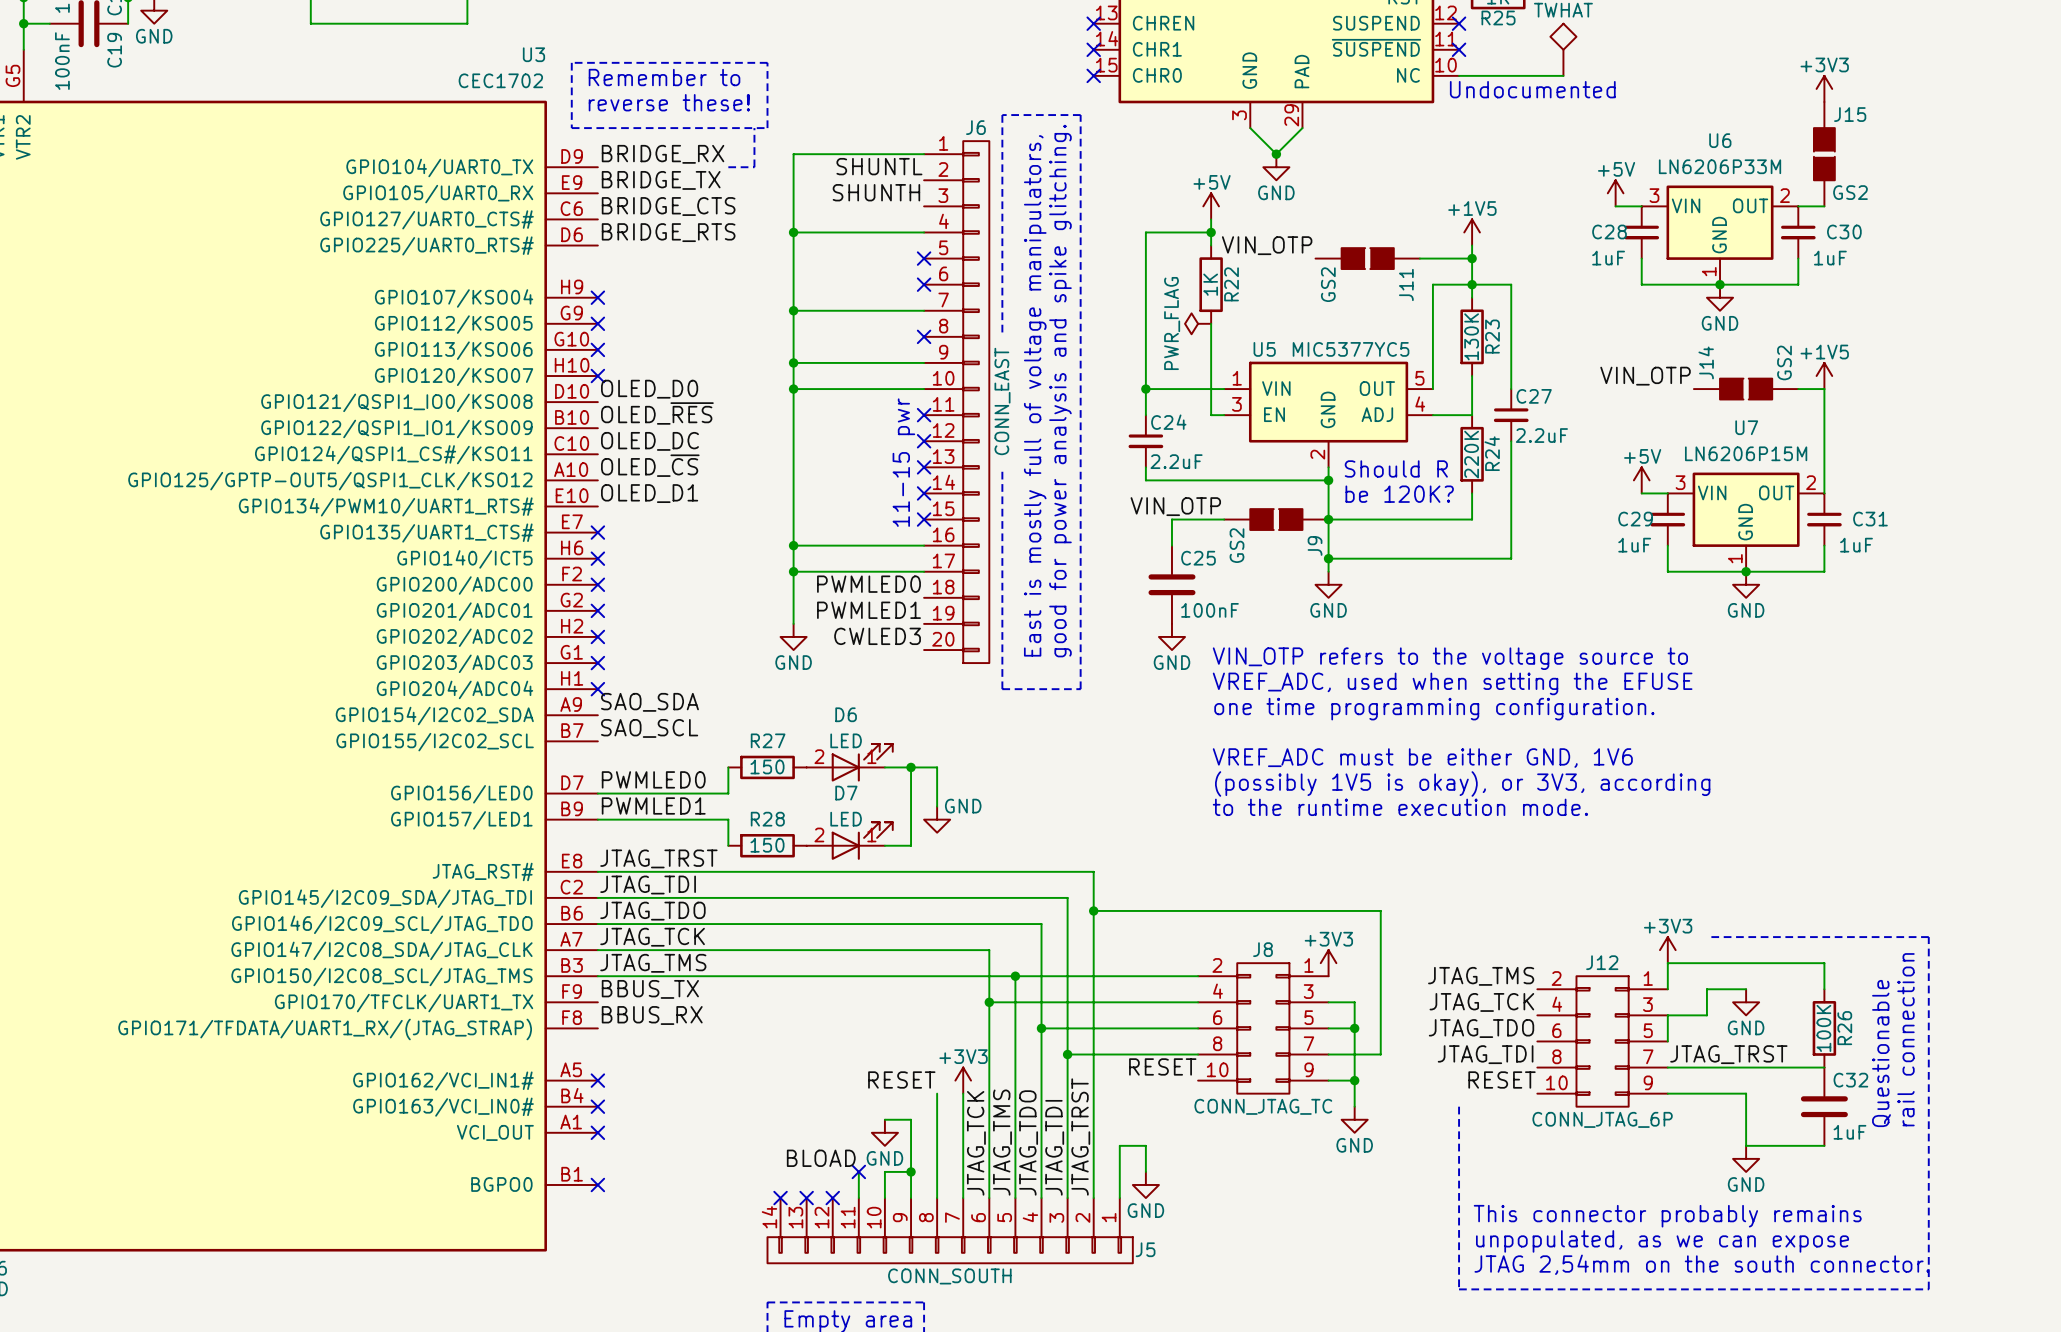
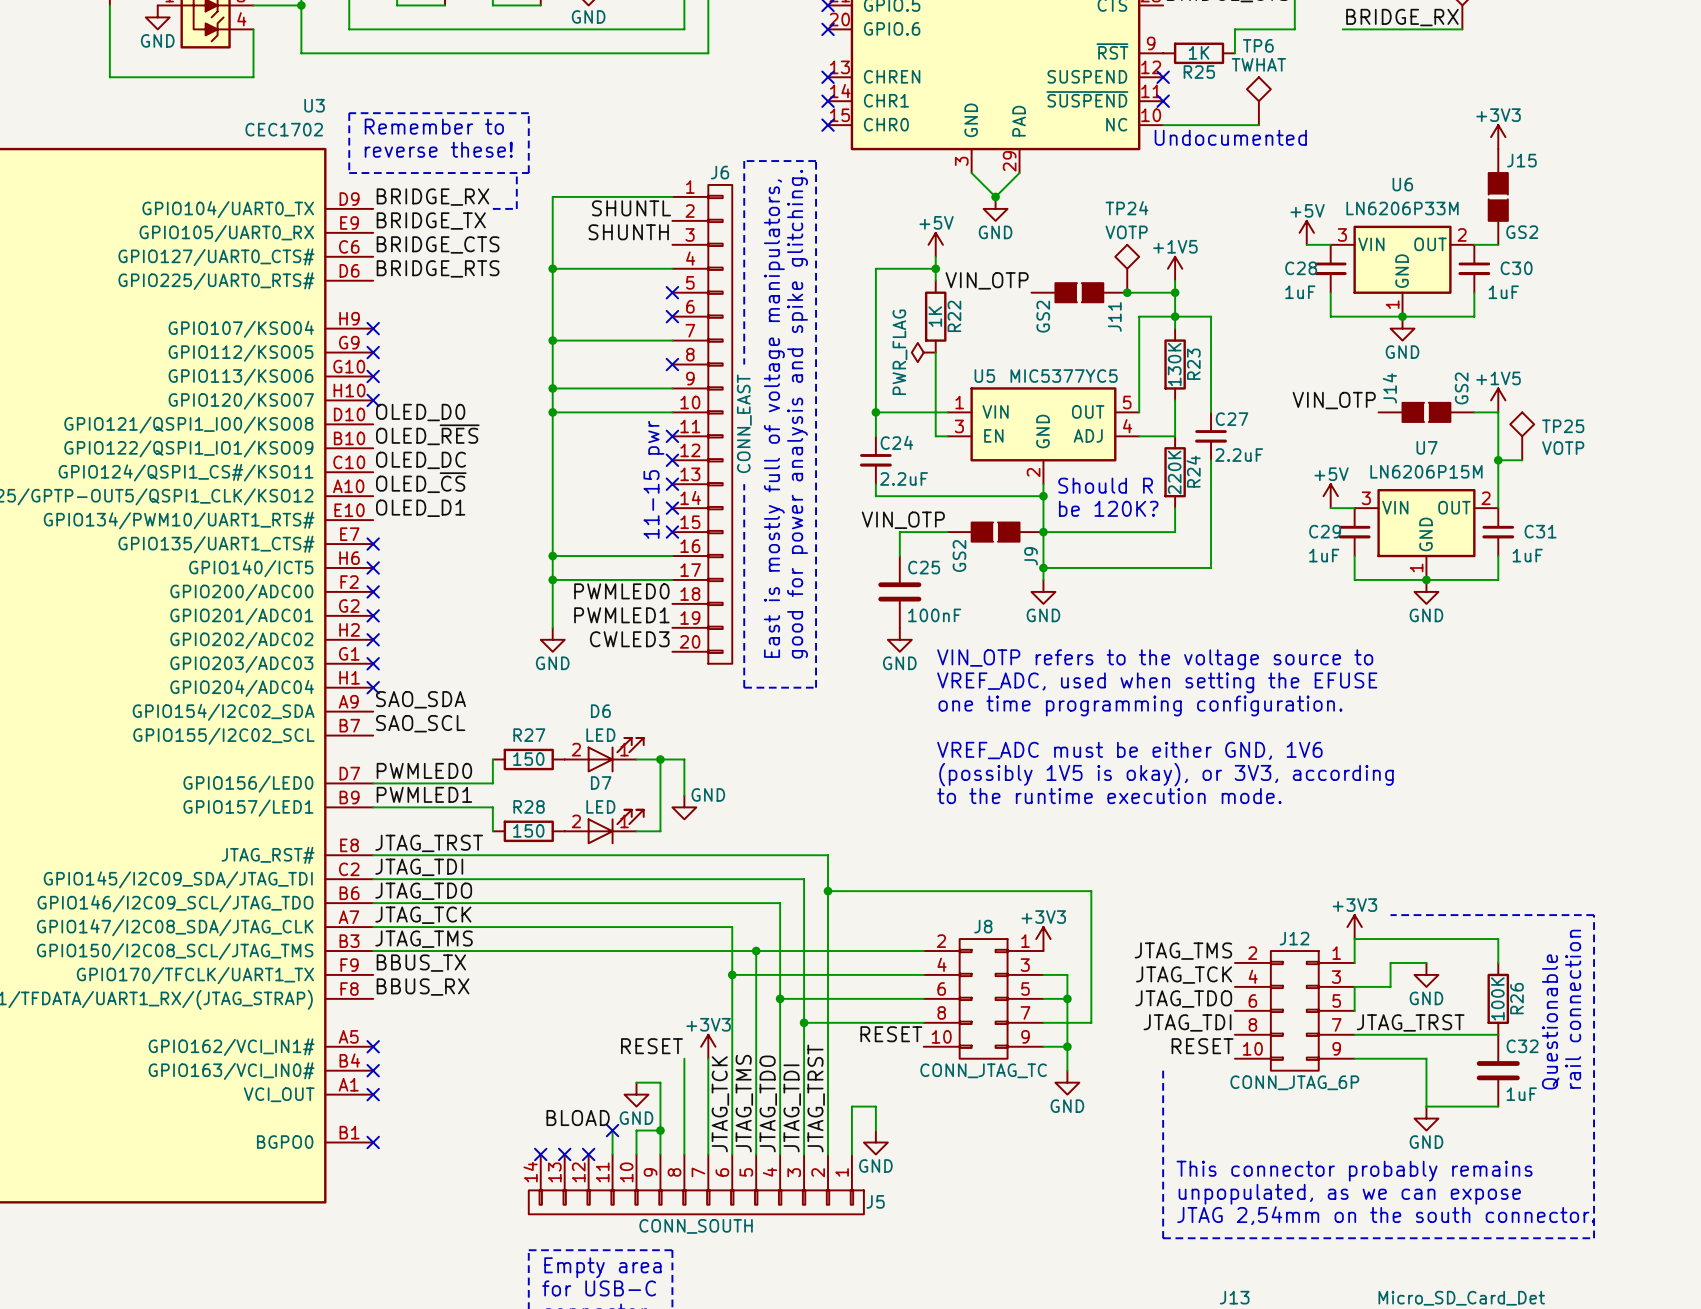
TP24: none -> VOTP (1127, 268)
junction: none -> (1127, 292)
TP25: none -> VOTP (1522, 436)
wire: none -> (1498, 460) (1522, 460)
junction: none -> (1498, 460)

